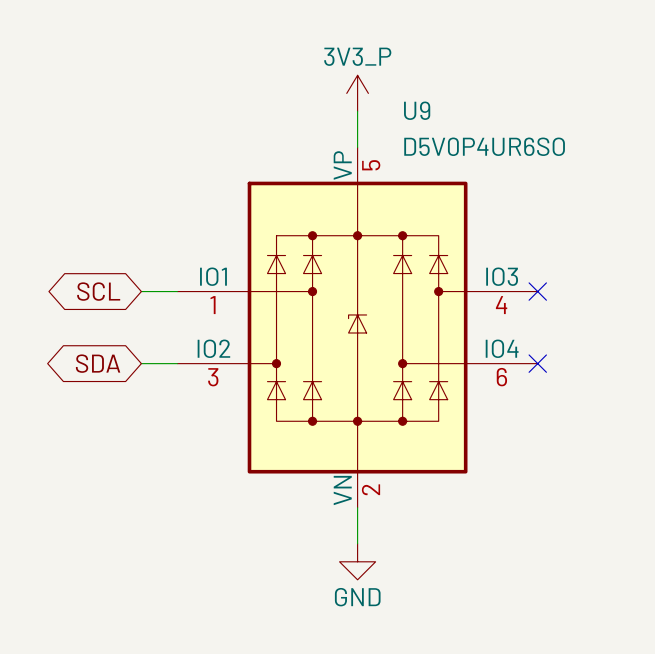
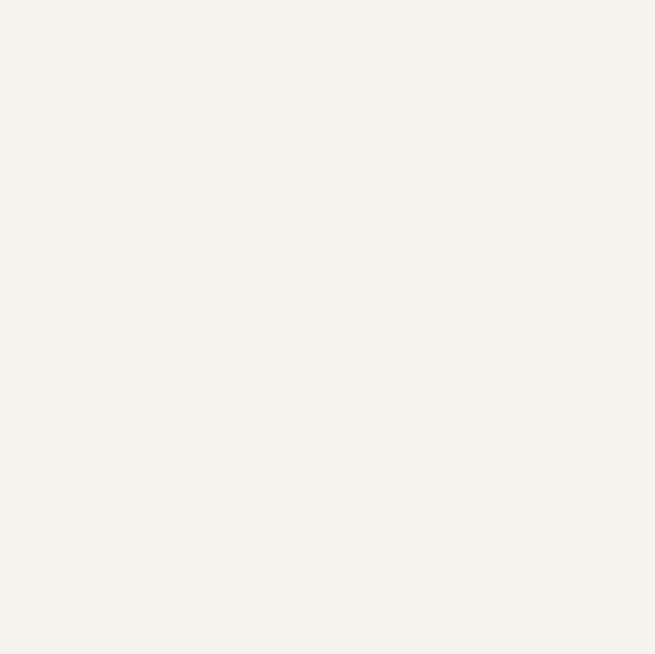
power symbol: 3V3_P (357, 93) -> none
wire: (357, 111) (357, 147) -> none
global label: SCL (98, 291) -> none
wire: (141, 291) (177, 291) -> none
no-connect mark: (537, 291) -> none
U9: D5V0P4UR6SO (357, 327) -> none
global label: SDA (98, 363) -> none
wire: (141, 363) (177, 363) -> none
no-connect mark: (537, 363) -> none
wire: (357, 507) (357, 543) -> none
power symbol: GND (357, 561) -> none

